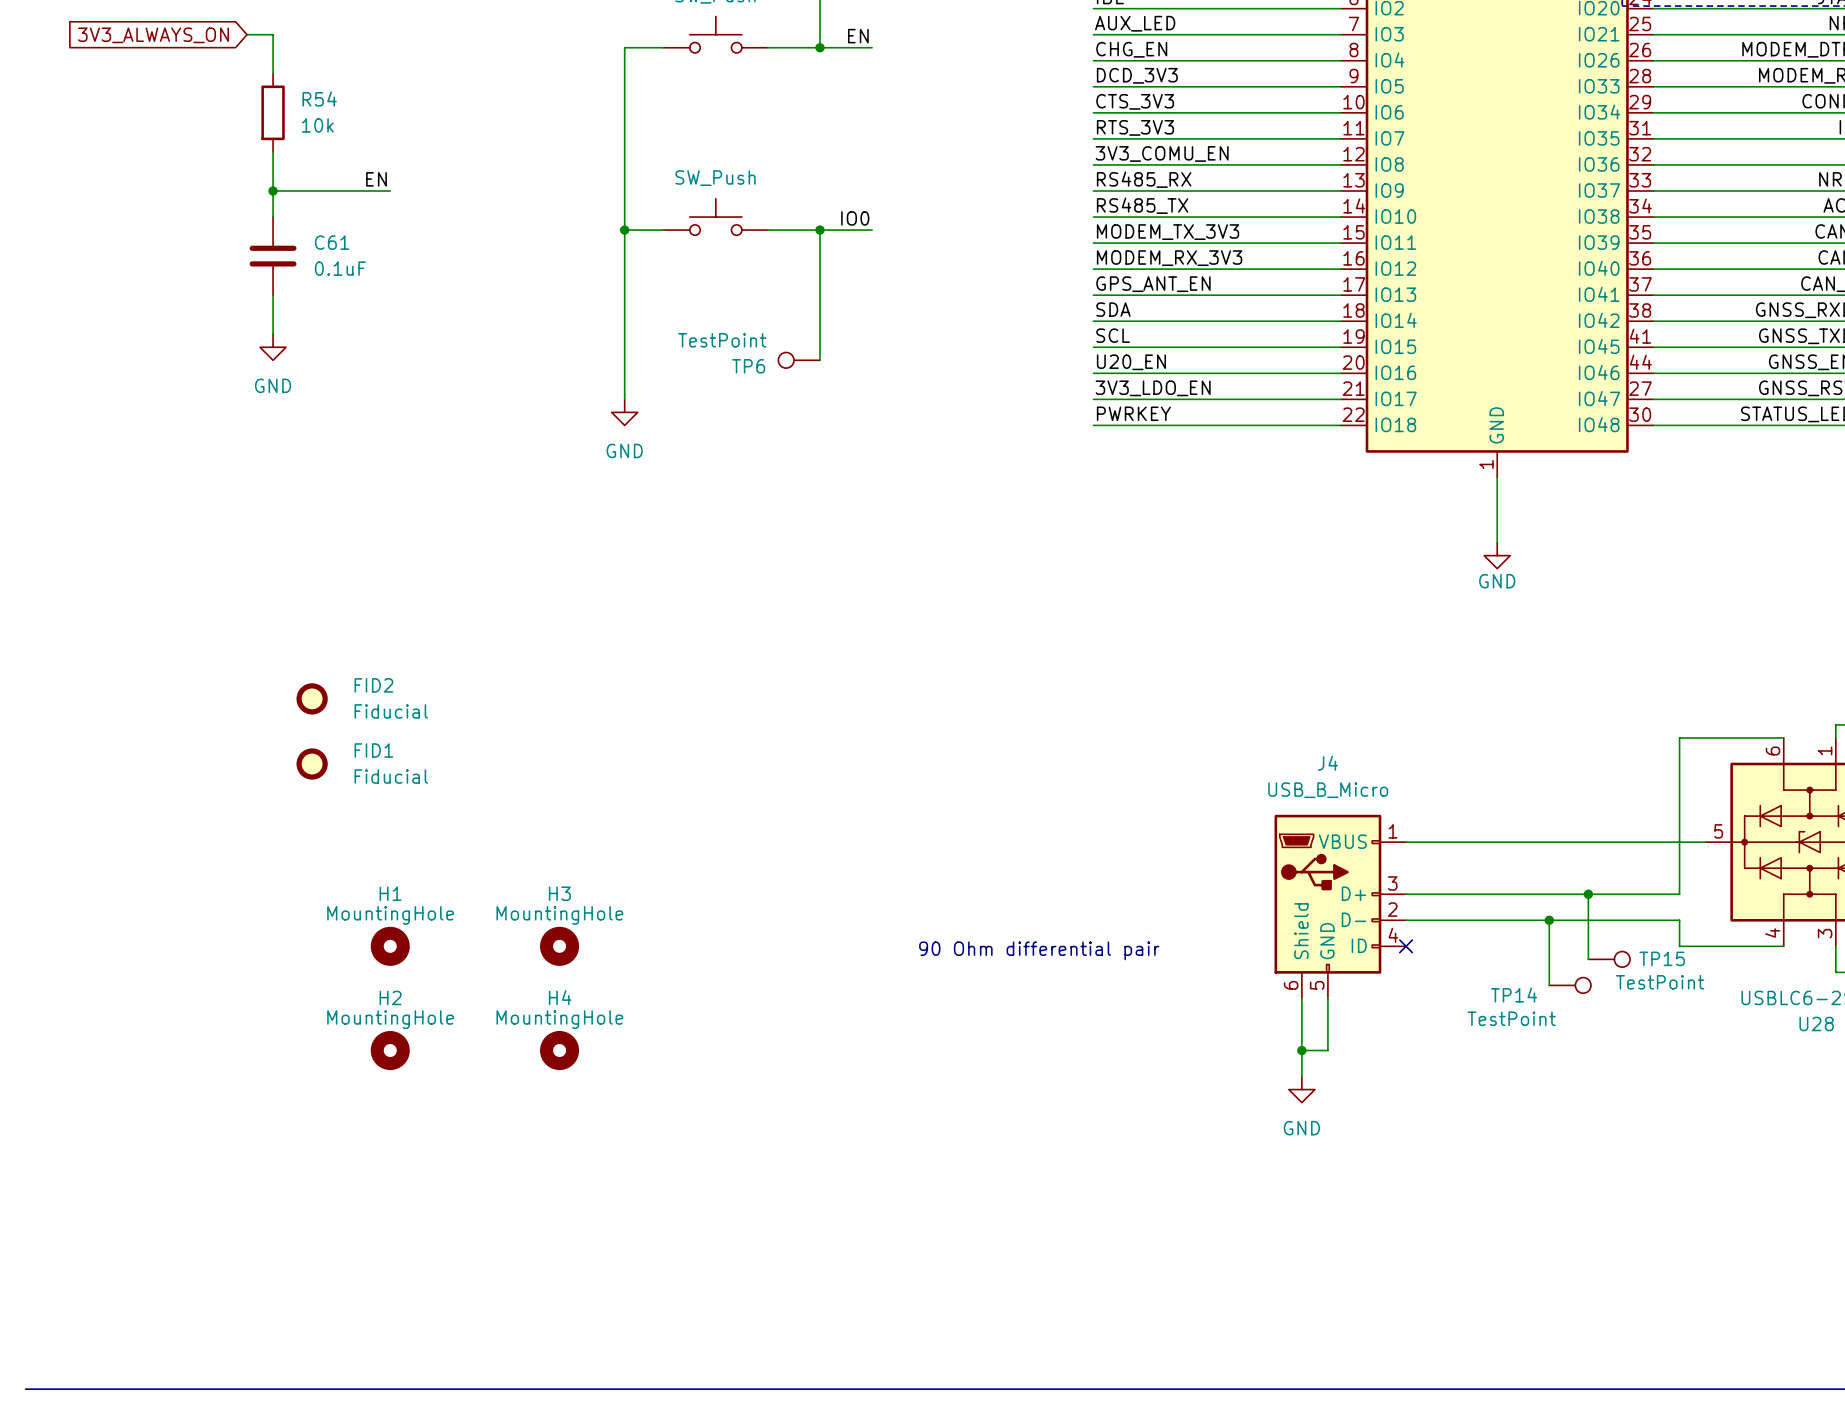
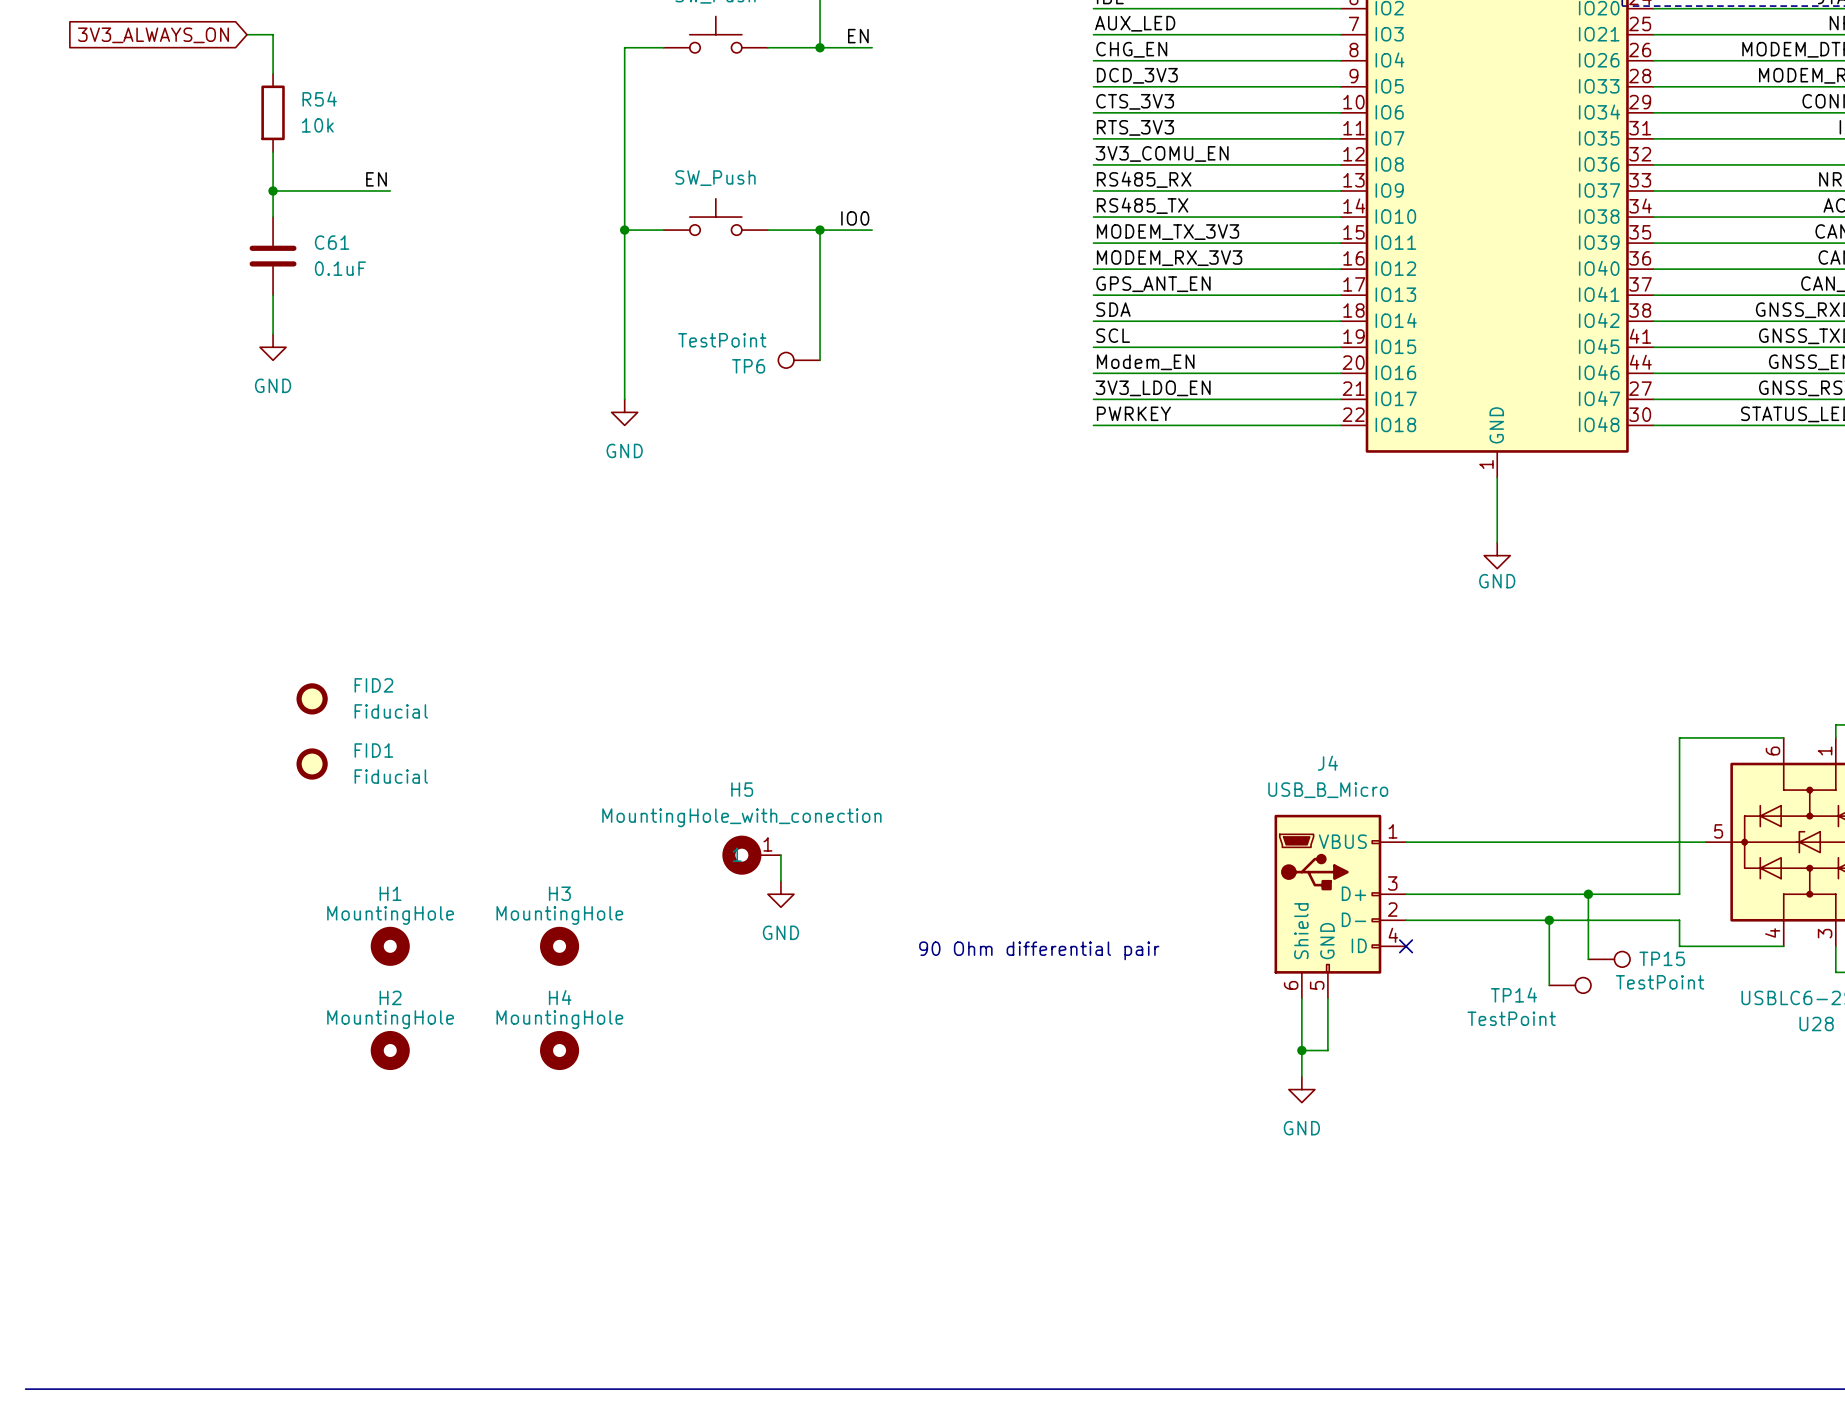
label: U20_EN (1131, 362) -> Modem_EN (1145, 362)
H5: none -> MountingHole_with_conection (751, 855)
wire: none -> (780, 855) (780, 881)
power symbol: none -> GND (780, 894)

